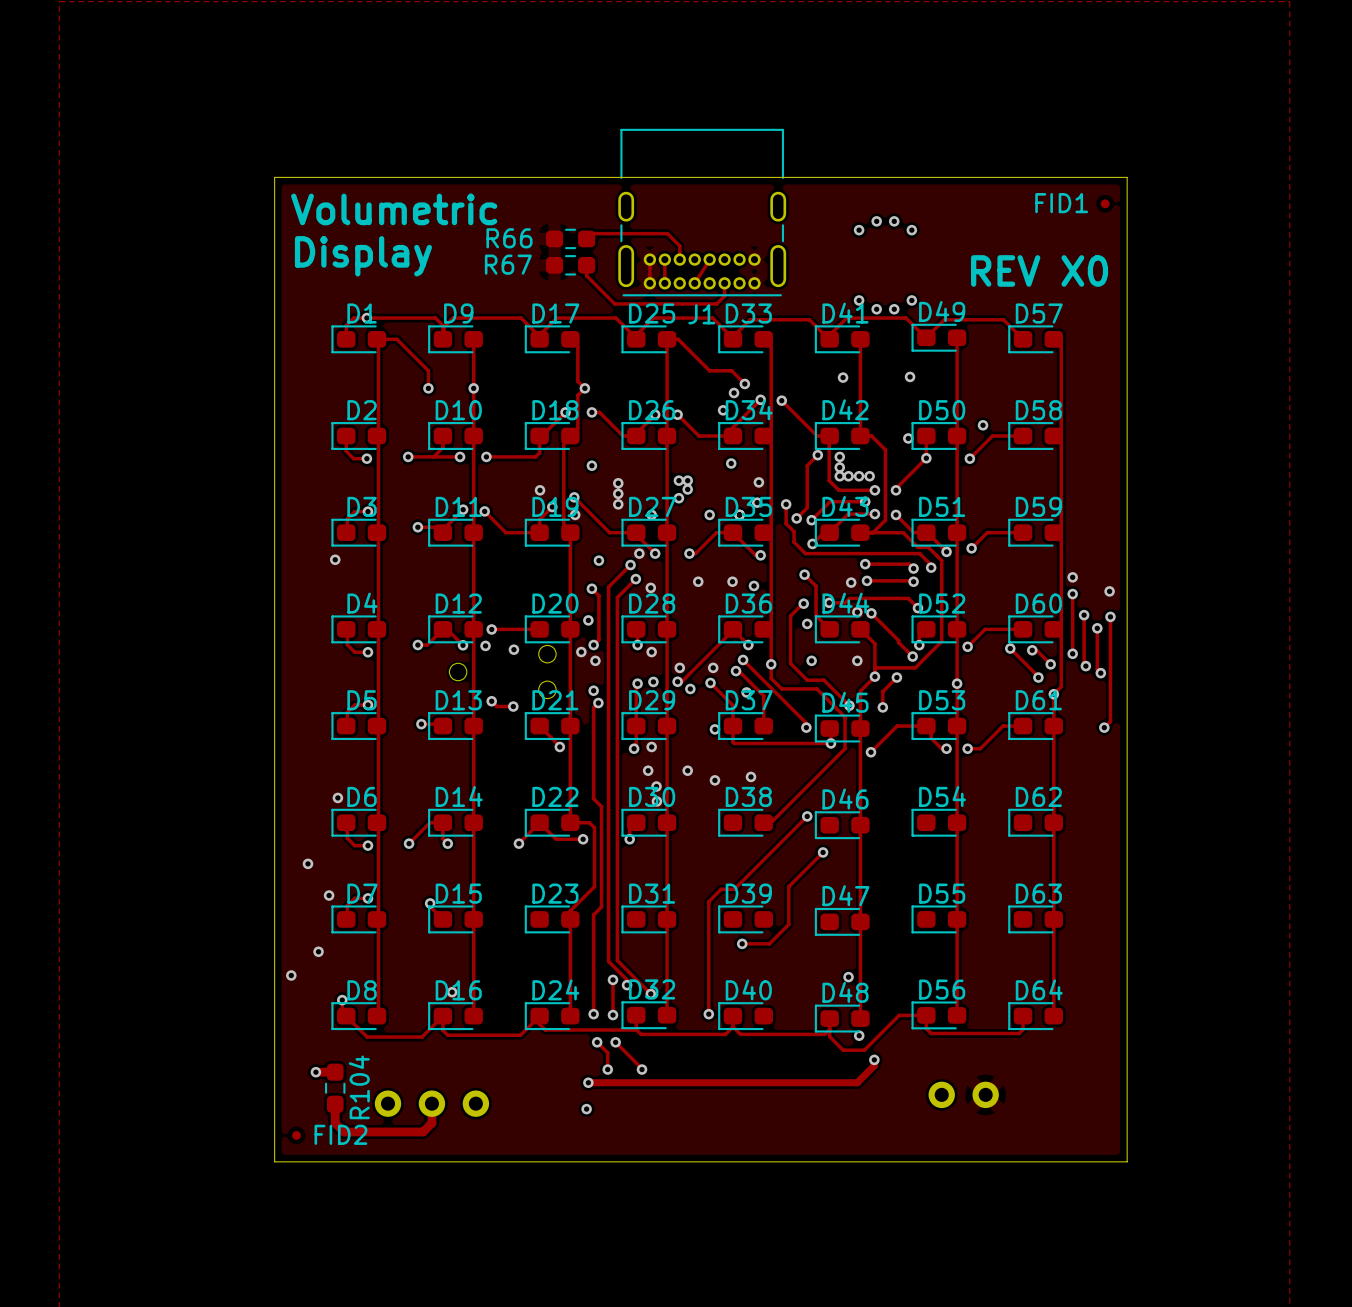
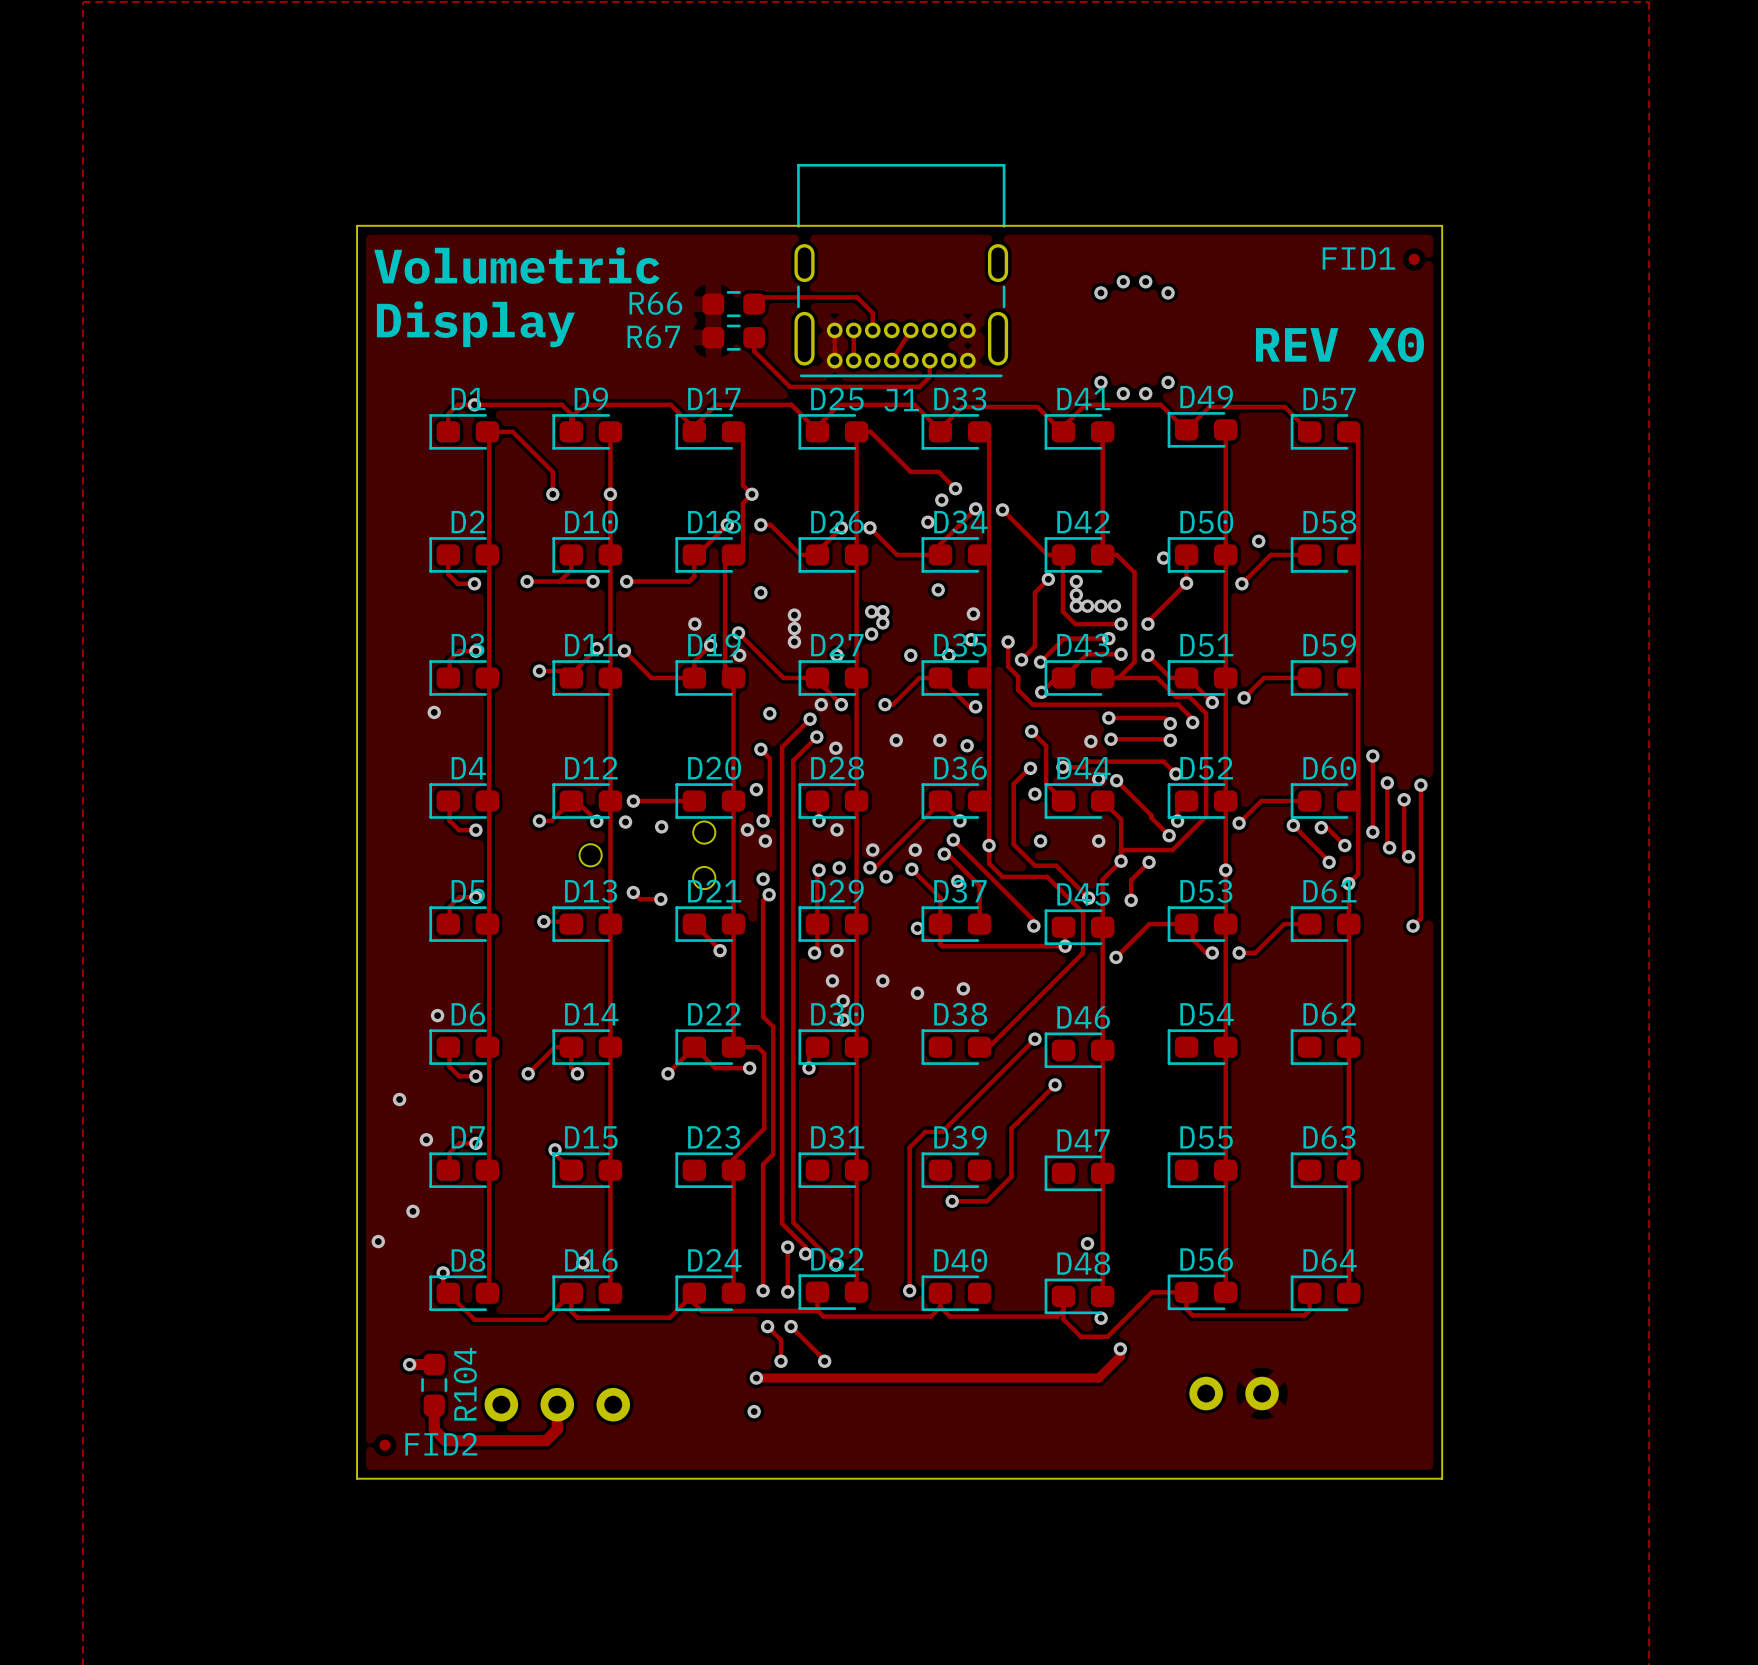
via: (910, 376) -> none
via: (843, 377) -> none
via: (1072, 577) -> none
via: (1109, 591) -> none

